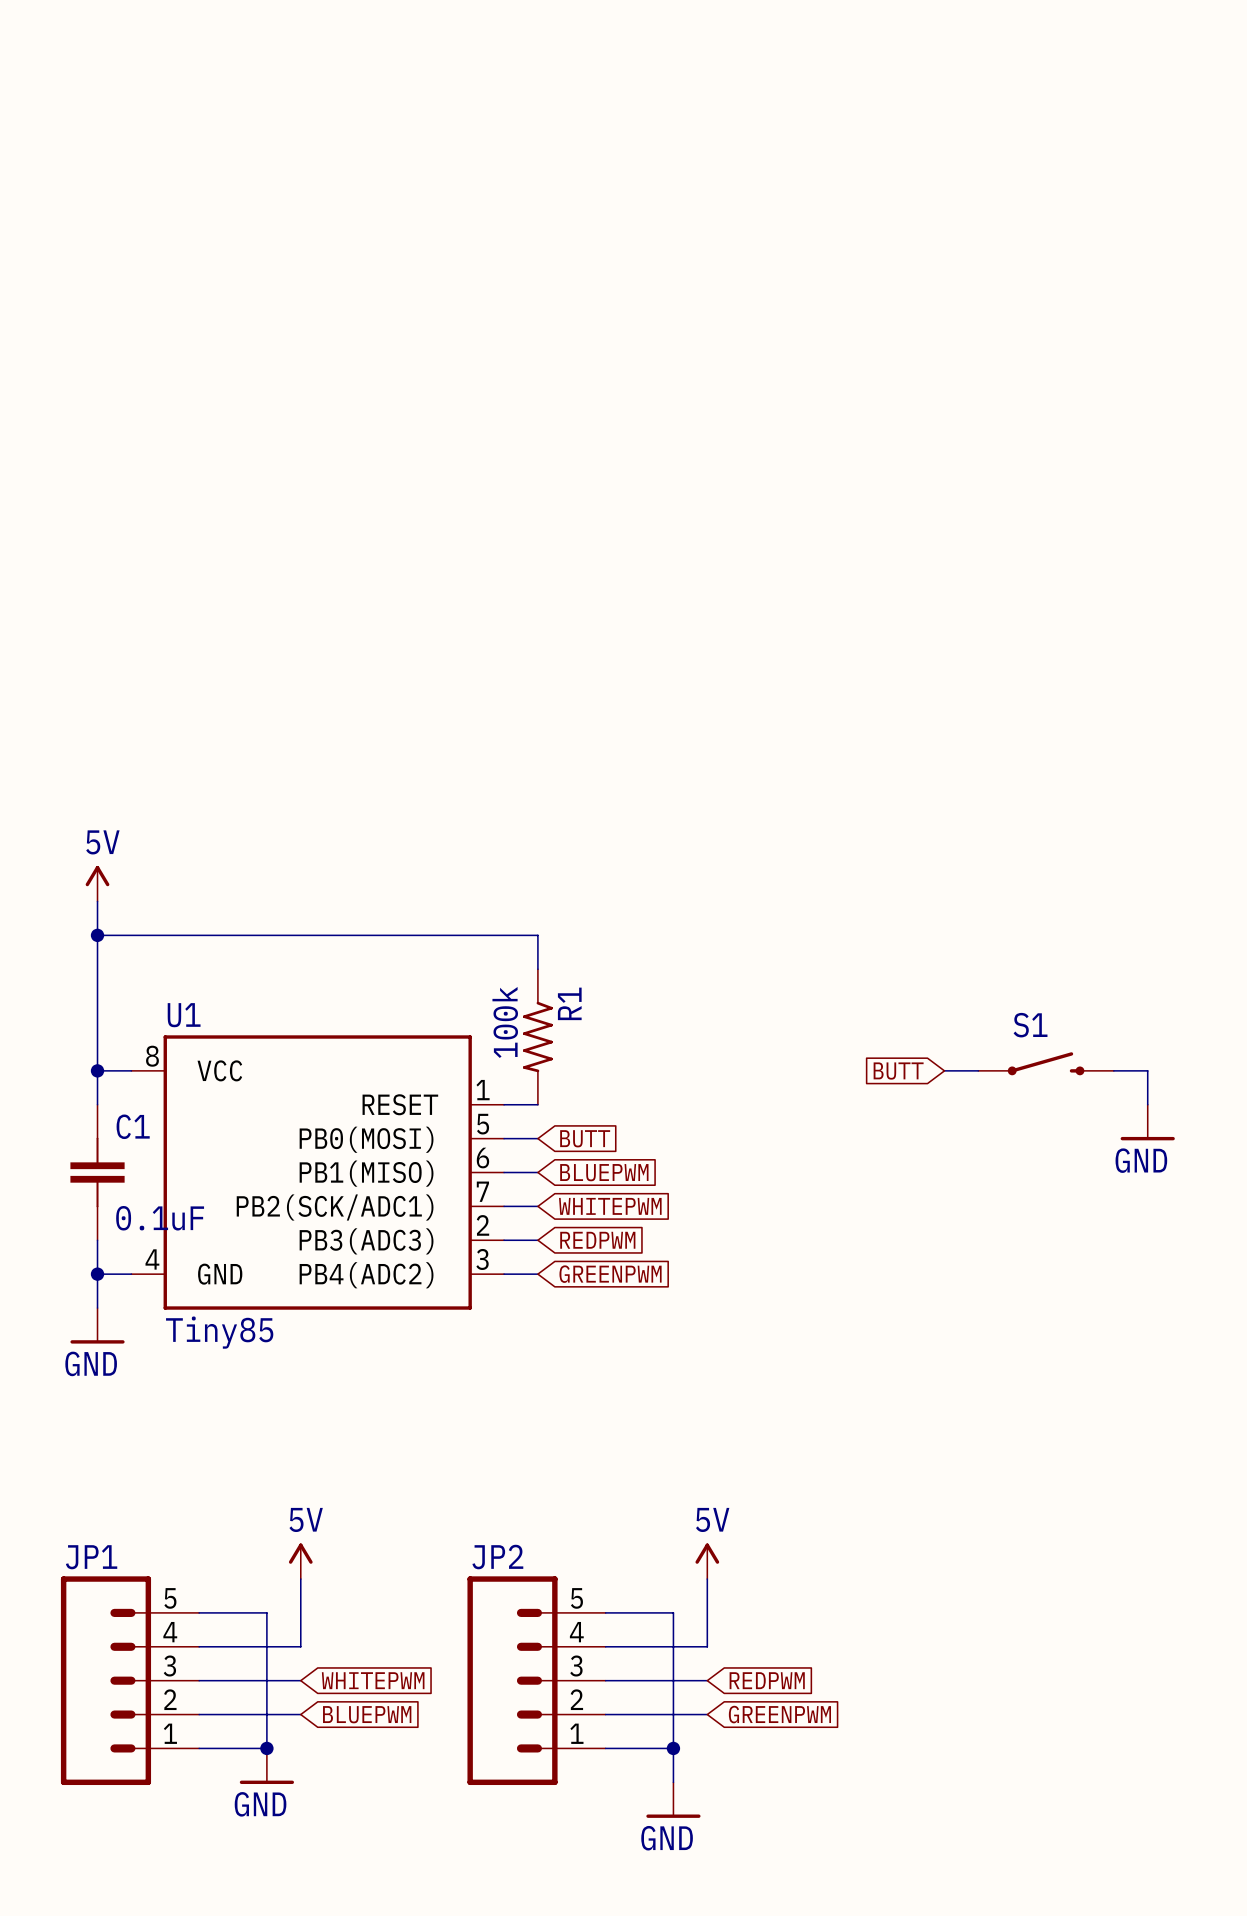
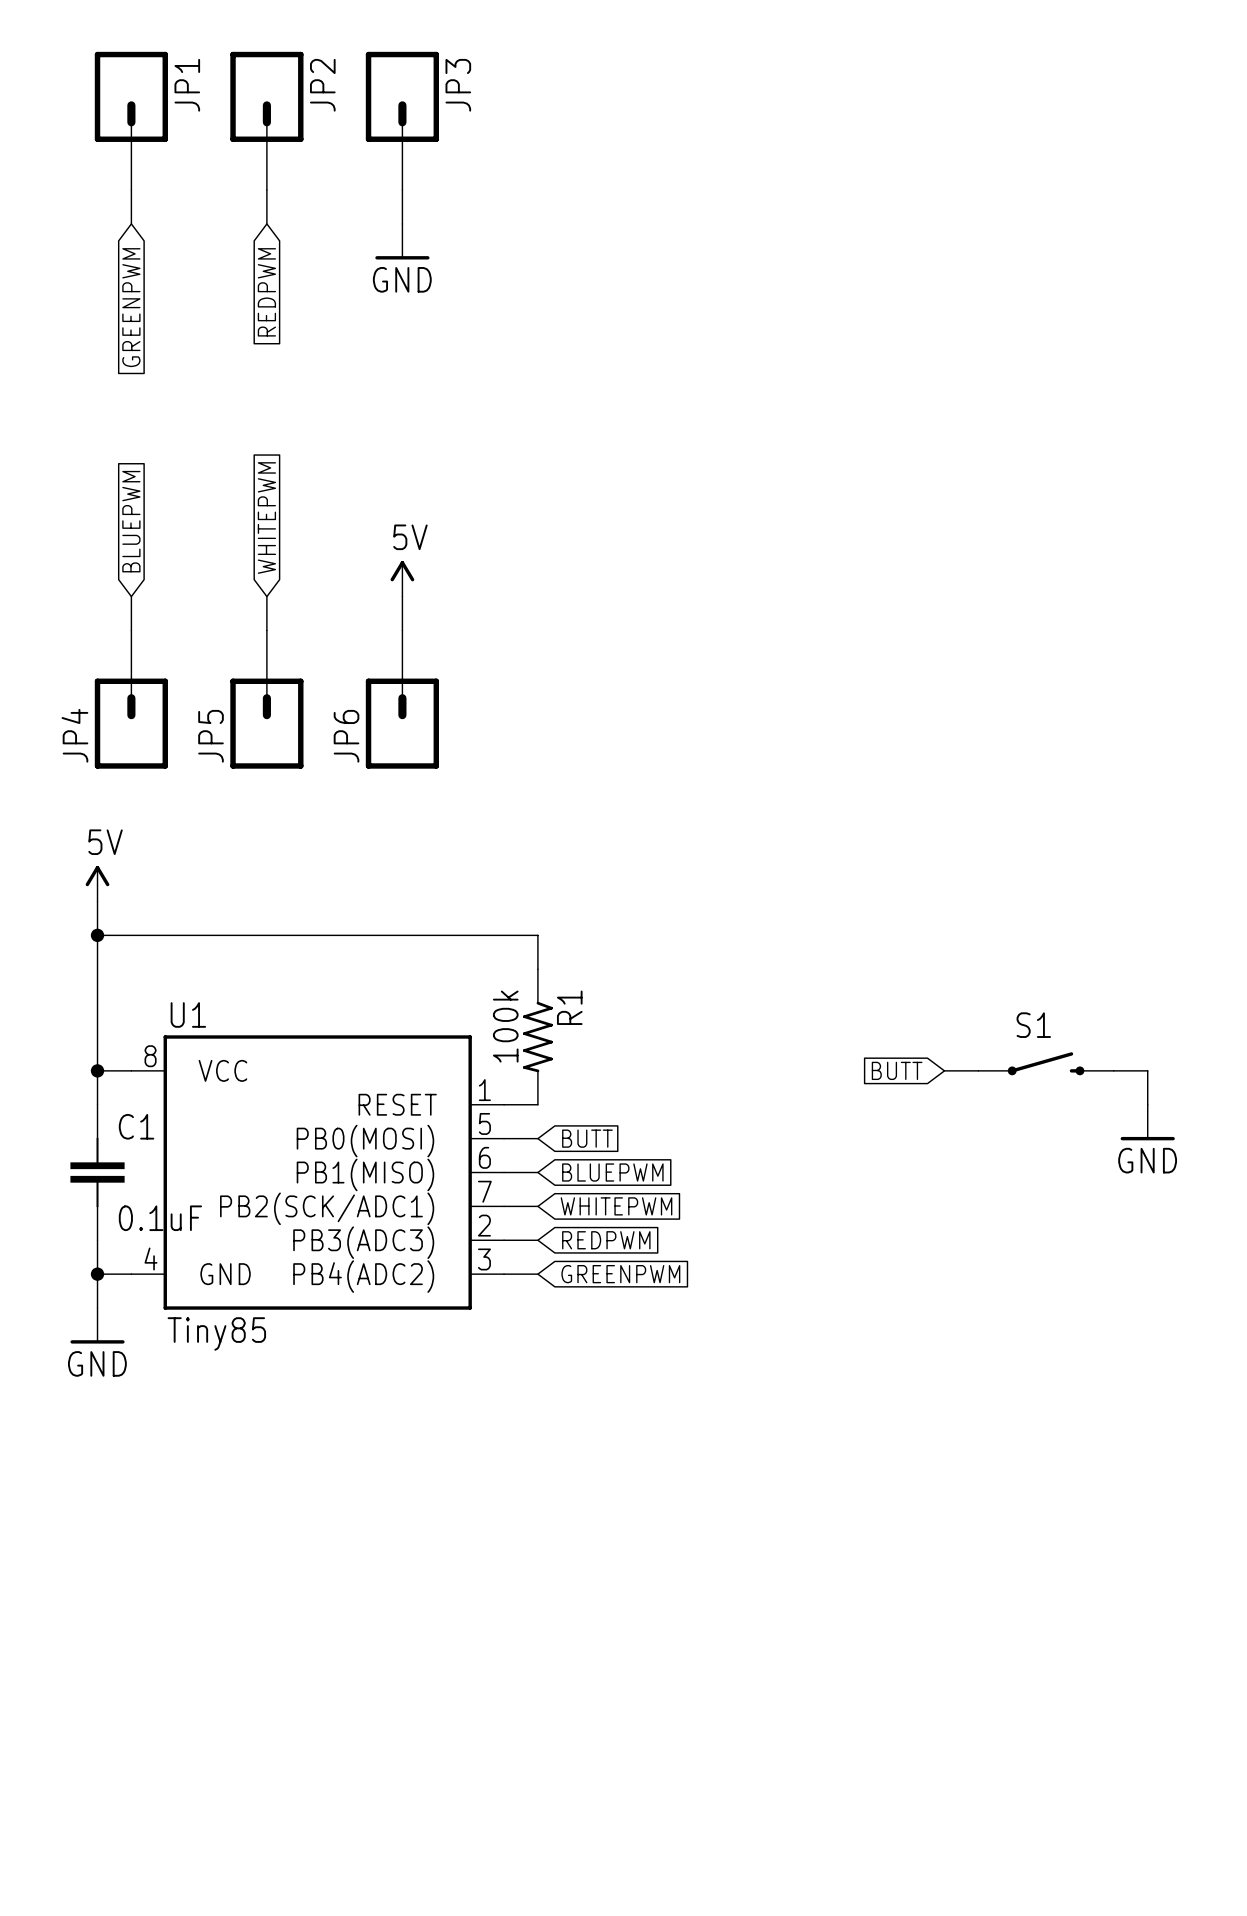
JP3: none -> (402, 120)
wire: none -> (131, 190) (131, 223)
wire: none -> (266, 190) (266, 223)
wire: none -> (402, 190) (402, 223)
power symbol: none -> GND (402, 241)
global label: none -> REDPWM (266, 292)
global label: none -> GREENPWM (131, 307)
global label: none -> WHITEPWM (266, 518)
global label: none -> BLUEPWM (131, 521)
power symbol: none -> 5V (402, 578)
wire: none -> (131, 596) (131, 630)
wire: none -> (266, 596) (266, 630)
wire: none -> (402, 596) (402, 630)
JP4: none -> (131, 699)
JP5: none -> (266, 699)
JP6: none -> (402, 699)
JP1 name position: JP1 (91, 1557) -> JP1 (187, 85)
JP2 name position: JP2 (497, 1557) -> JP2 (322, 85)
power symbol: 5V (300, 1561) -> none
power symbol: 5V (707, 1561) -> none
JP1 symbol: [60, 1576, 200, 1786] -> [94, 51, 168, 191]
JP2 symbol: [467, 1576, 606, 1786] -> [230, 51, 304, 191]
wire: (300, 1579) (300, 1646) (199, 1646) -> none
wire: (707, 1579) (707, 1646) (605, 1646) -> none
wire: (199, 1612) (266, 1612) (266, 1748) (199, 1748) -> none
wire: (605, 1612) (673, 1612) (673, 1782) -> none
wire: (199, 1680) (300, 1680) -> none
global label: WHITEPWM (373, 1680) -> none
wire: (605, 1680) (707, 1680) -> none
global label: REDPWM (767, 1680) -> none
wire: (199, 1714) (300, 1714) -> none
global label: BLUEPWM (367, 1714) -> none
wire: (605, 1714) (707, 1714) -> none
global label: GREENPWM (779, 1714) -> none
junction: (266, 1748) -> none
wire: (605, 1748) (673, 1748) -> none
junction: (673, 1748) -> none
power symbol: GND (266, 1766) -> none
power symbol: GND (673, 1800) -> none

